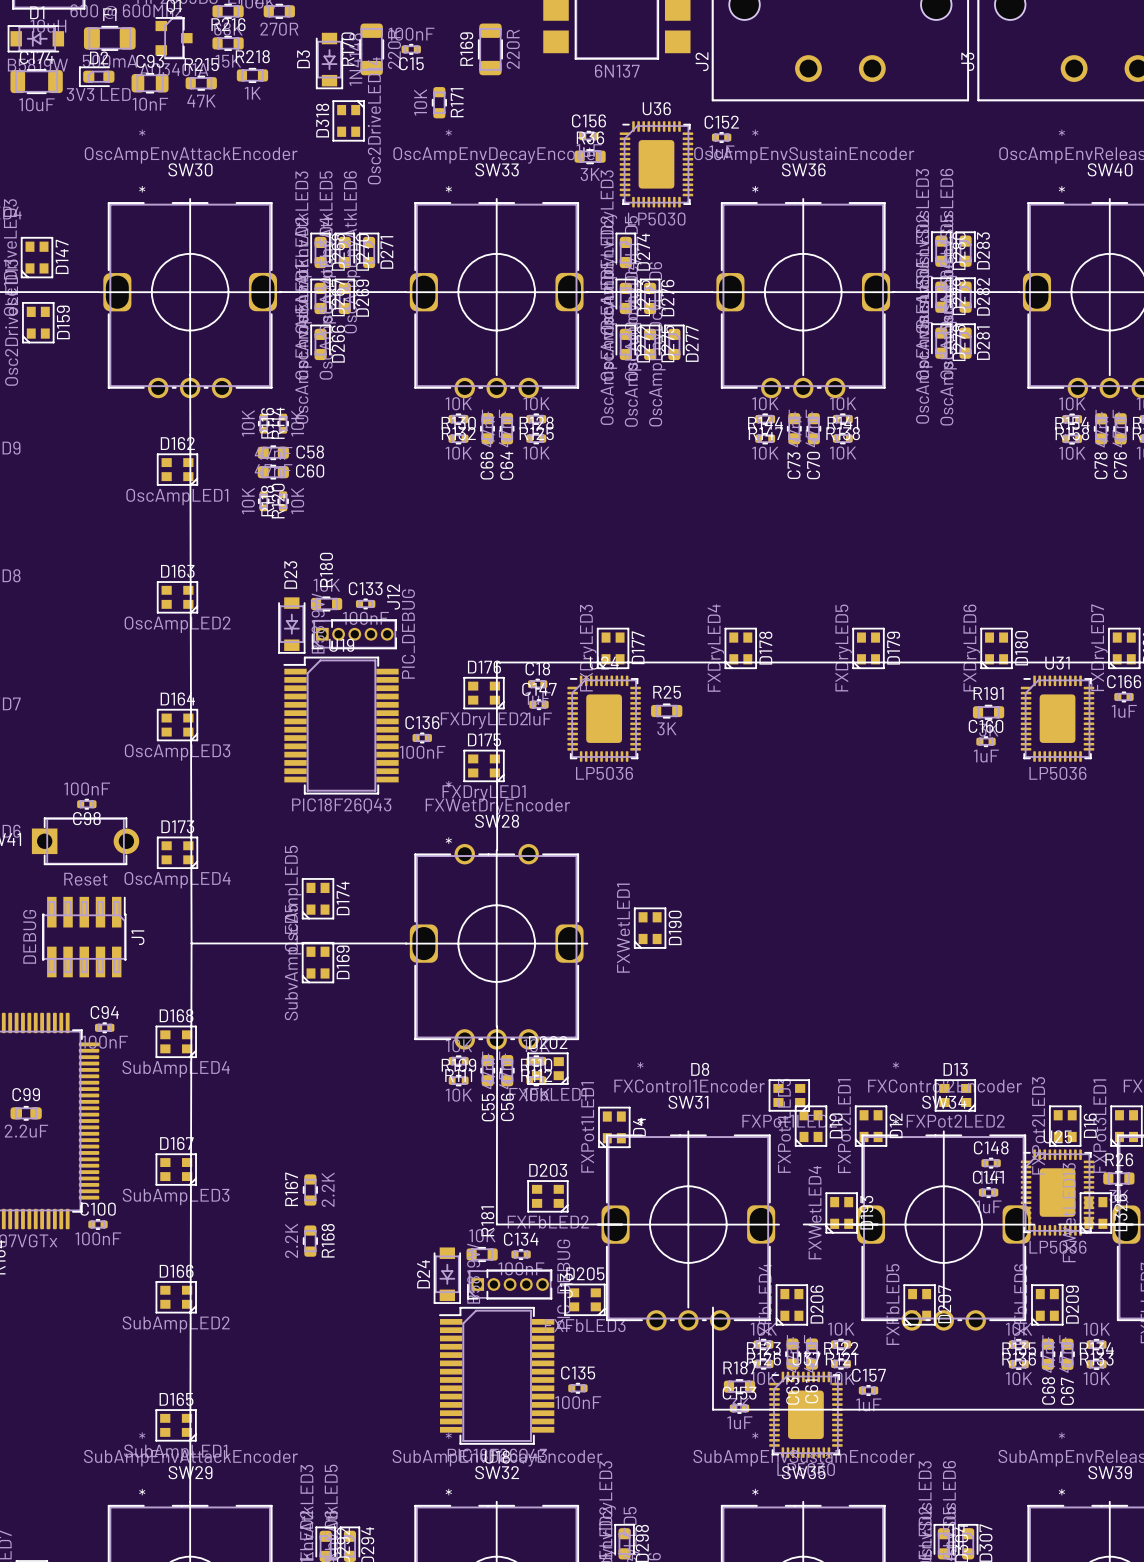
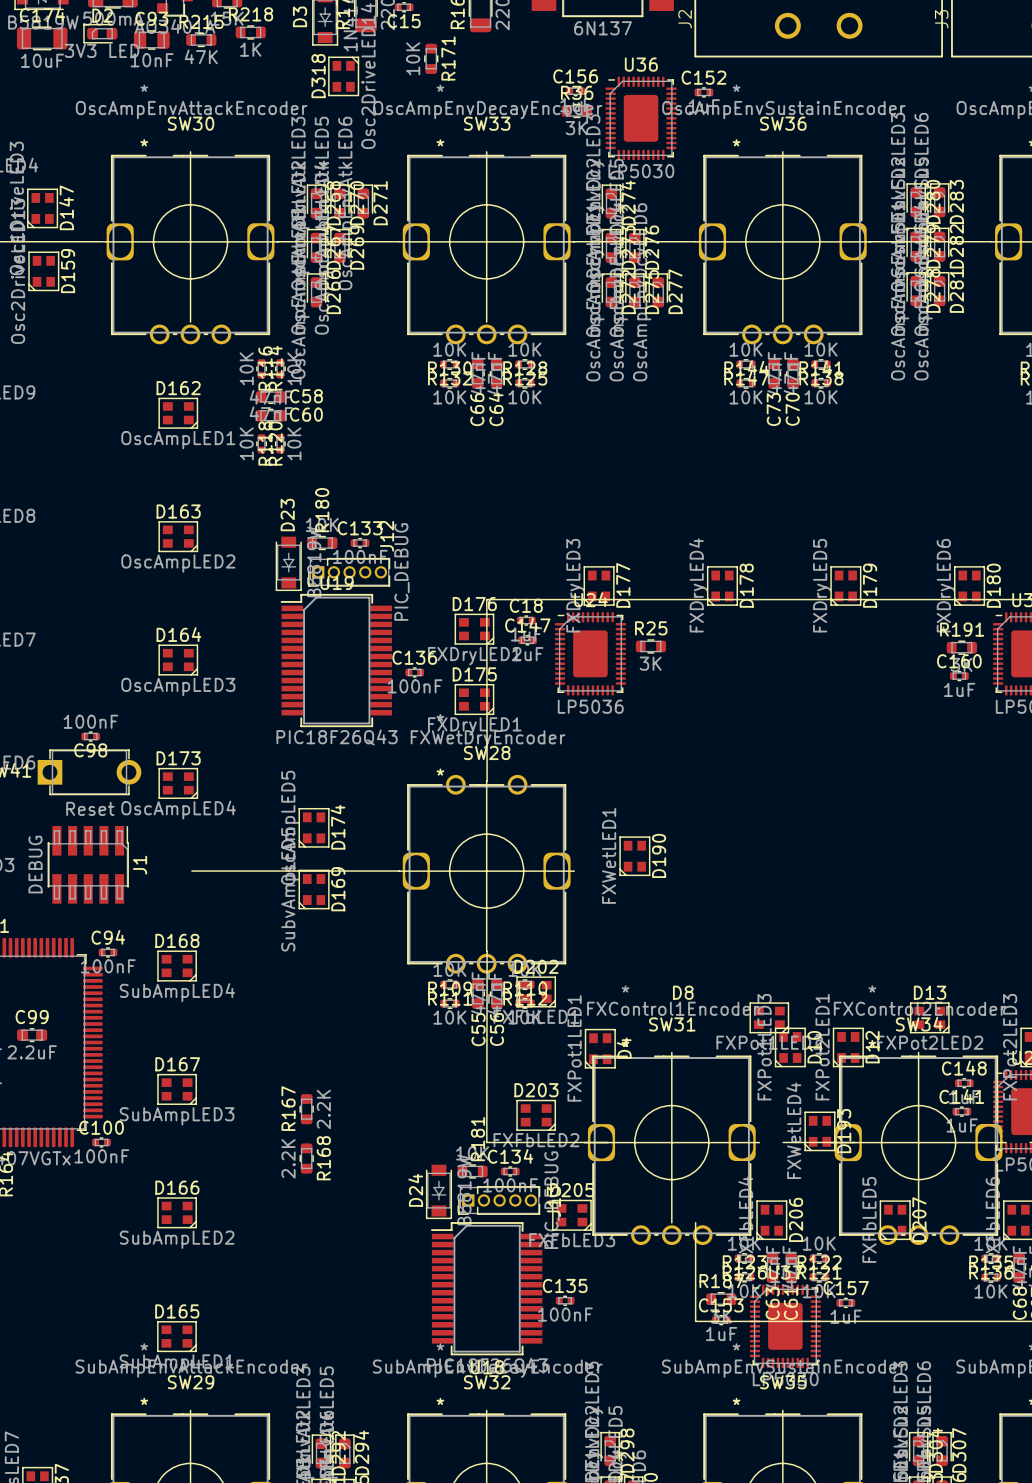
line: (190, 375) (190, 1501) -> none

